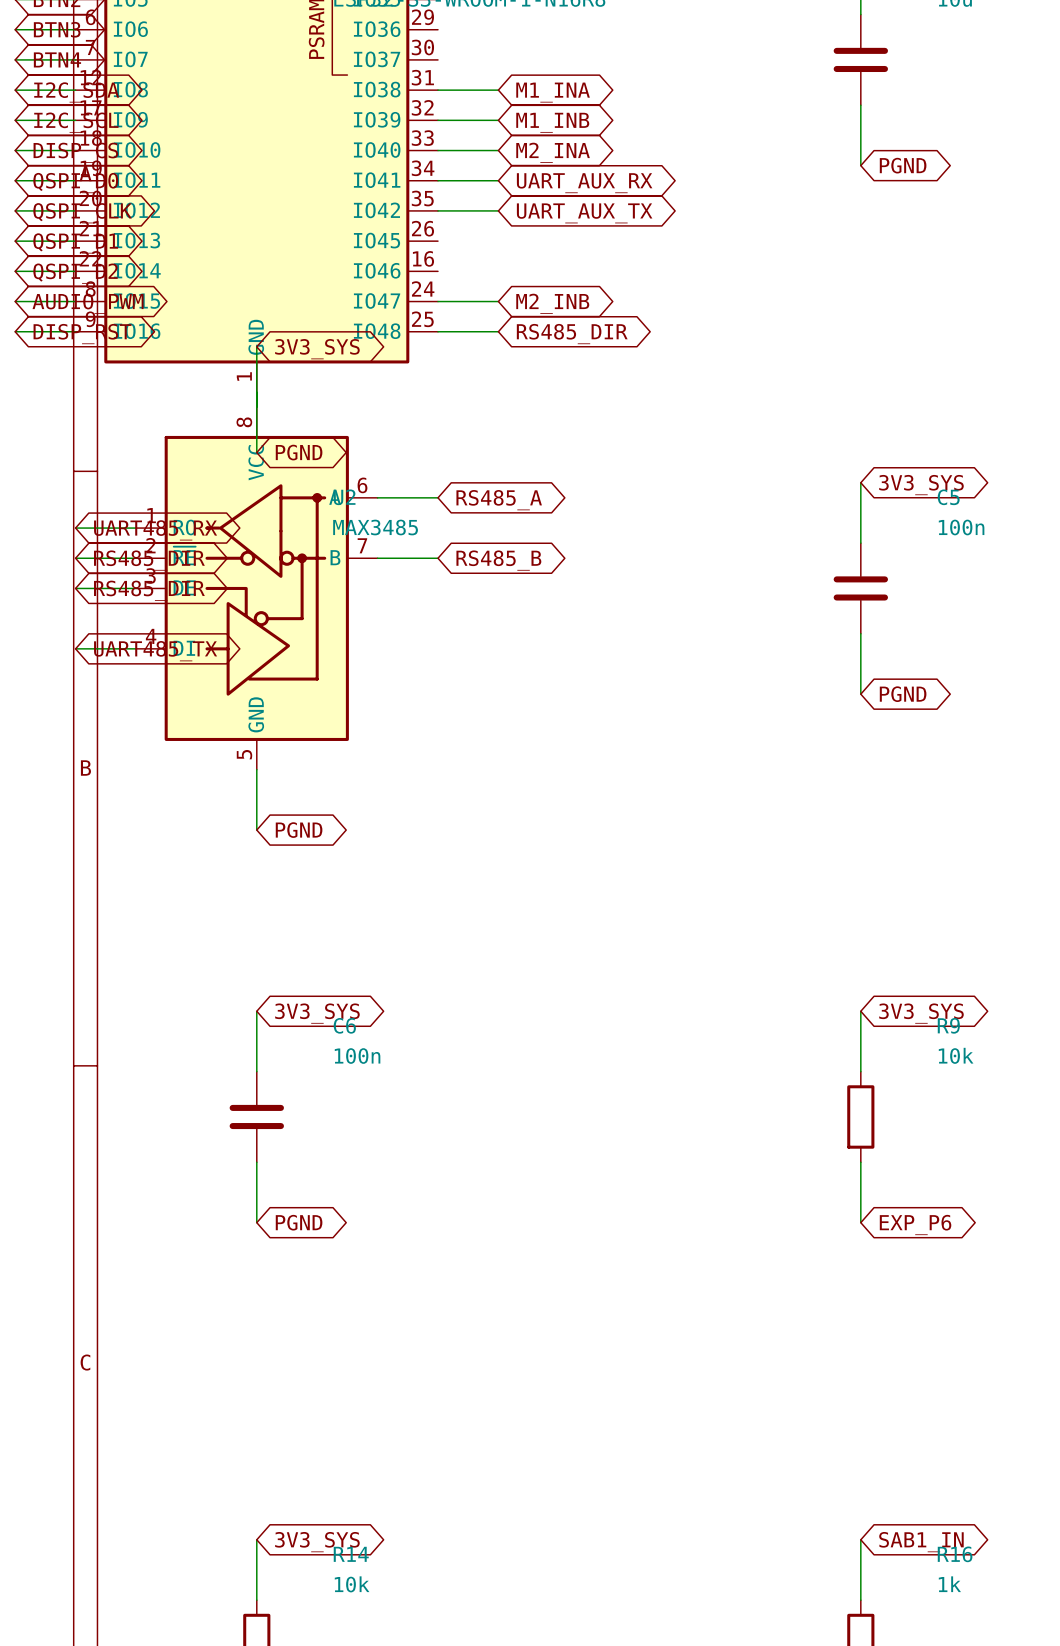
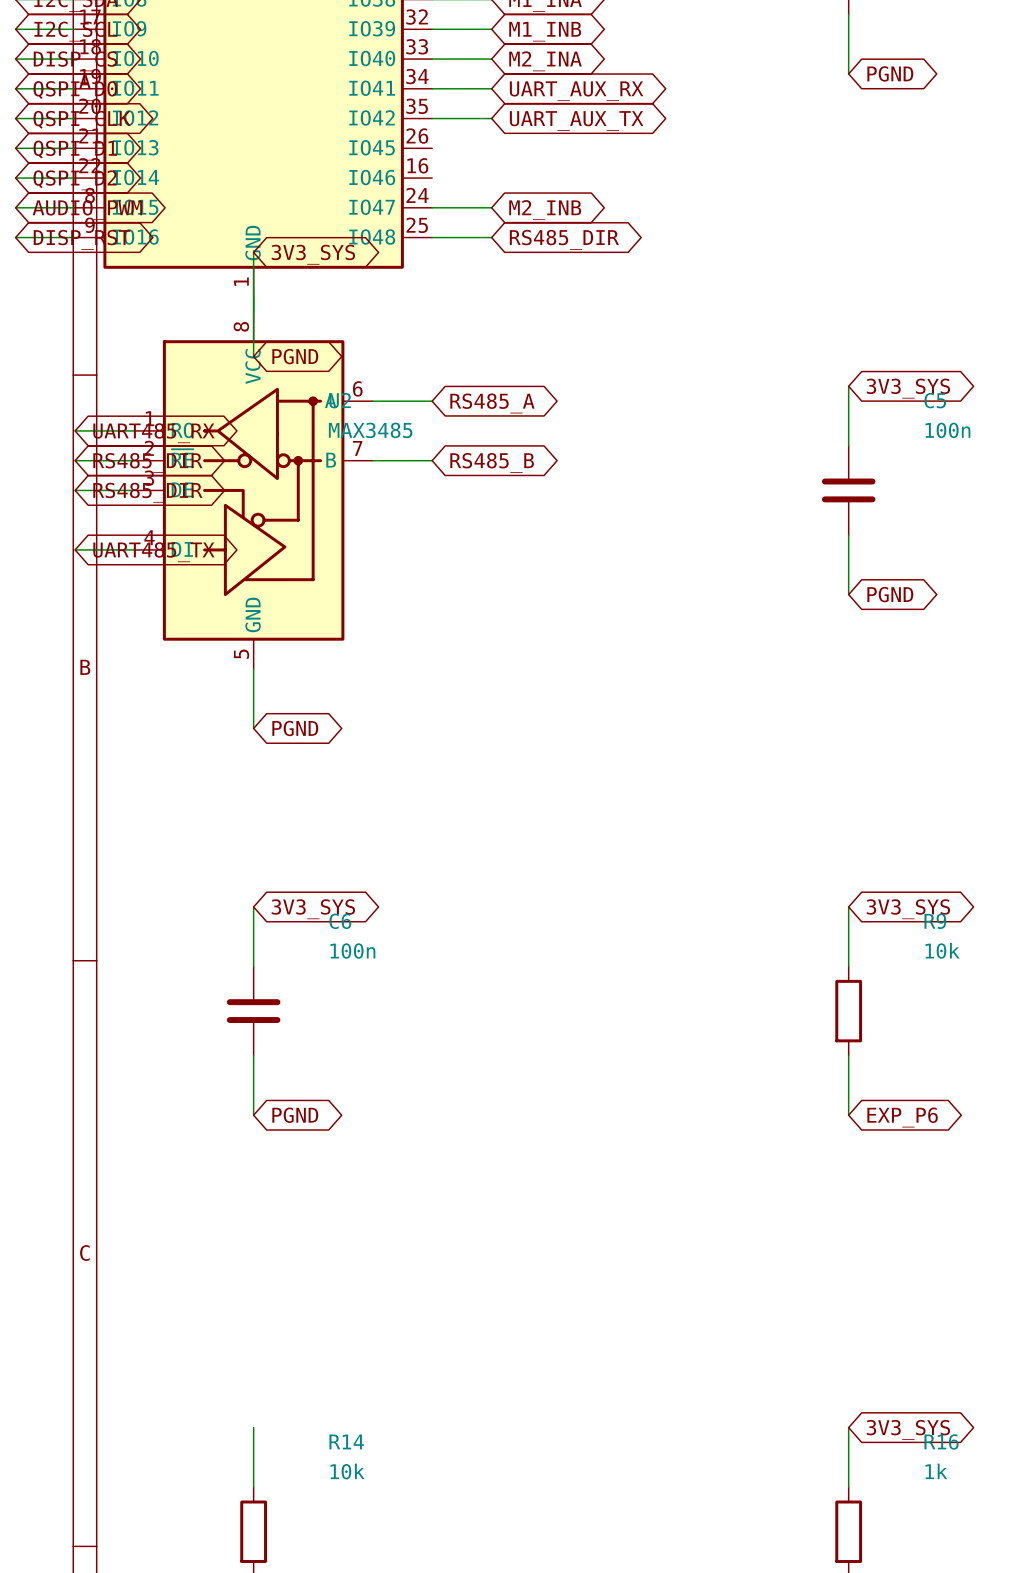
global label: 3V3_SYS (317, 1542) -> none
global label: SAB1_IN (921, 1542) -> 3V3_SYS (908, 1429)

